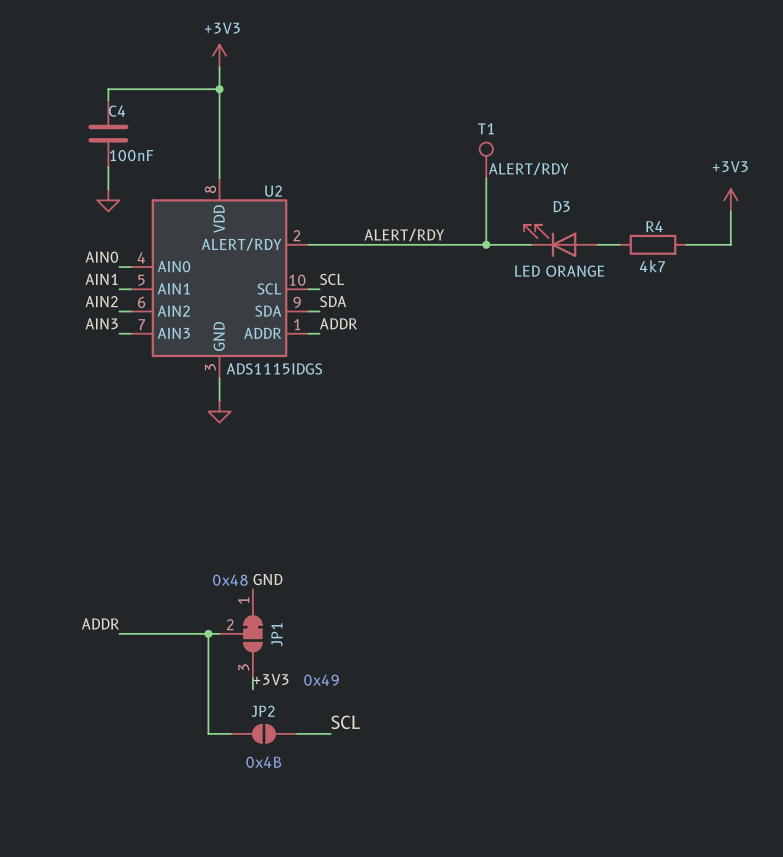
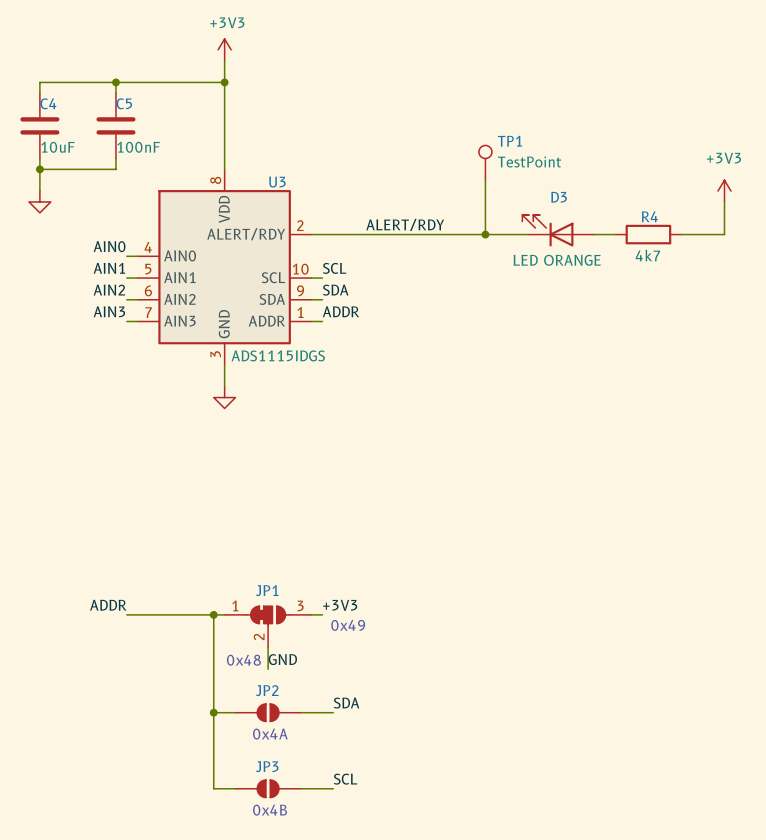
wire: none -> (115, 82) (39, 82) (39, 93)
junction: none -> (115, 82)
C4 name: C4 (117, 111) -> C5 (124, 103)
C4: none -> 10uF (39, 125)
T1: ALERT/RDY (486, 160) -> none
wire: none -> (39, 158) (39, 191)
TP1: none -> TestPoint (485, 162)
junction: none -> (39, 169)
wire: (108, 178) (108, 189) -> (115, 169) (39, 169)
U2 name: U2 (273, 191) -> U3 (277, 182)
power symbol position: (108, 200) -> (39, 201)
label position: GND (267, 579) -> GND (282, 659)
text position: 0x48 (230, 580) -> 0x48 (243, 660)
JP1 rotation: 0° (251, 633) -> 90° counterclockwise (268, 615)
wire: none -> (311, 614) (322, 614)
wire: none -> (268, 647) (268, 669)
wire: (252, 678) (252, 689) -> none
label position: +3V3 (271, 679) -> +3V3 (340, 605)
text position: 0x49 (321, 680) -> 0x49 (348, 625)
label: SCL (345, 722) -> SDA (346, 703)
wire: none -> (213, 712) (213, 788) (235, 788)
junction: none -> (213, 712)
text: none -> 0x4A (270, 734)
text position: 0x4B (263, 762) -> 0x4B (270, 810)
label: none -> SCL (345, 779)
JP3: none -> (268, 788)
wire: none -> (300, 788) (333, 788)

